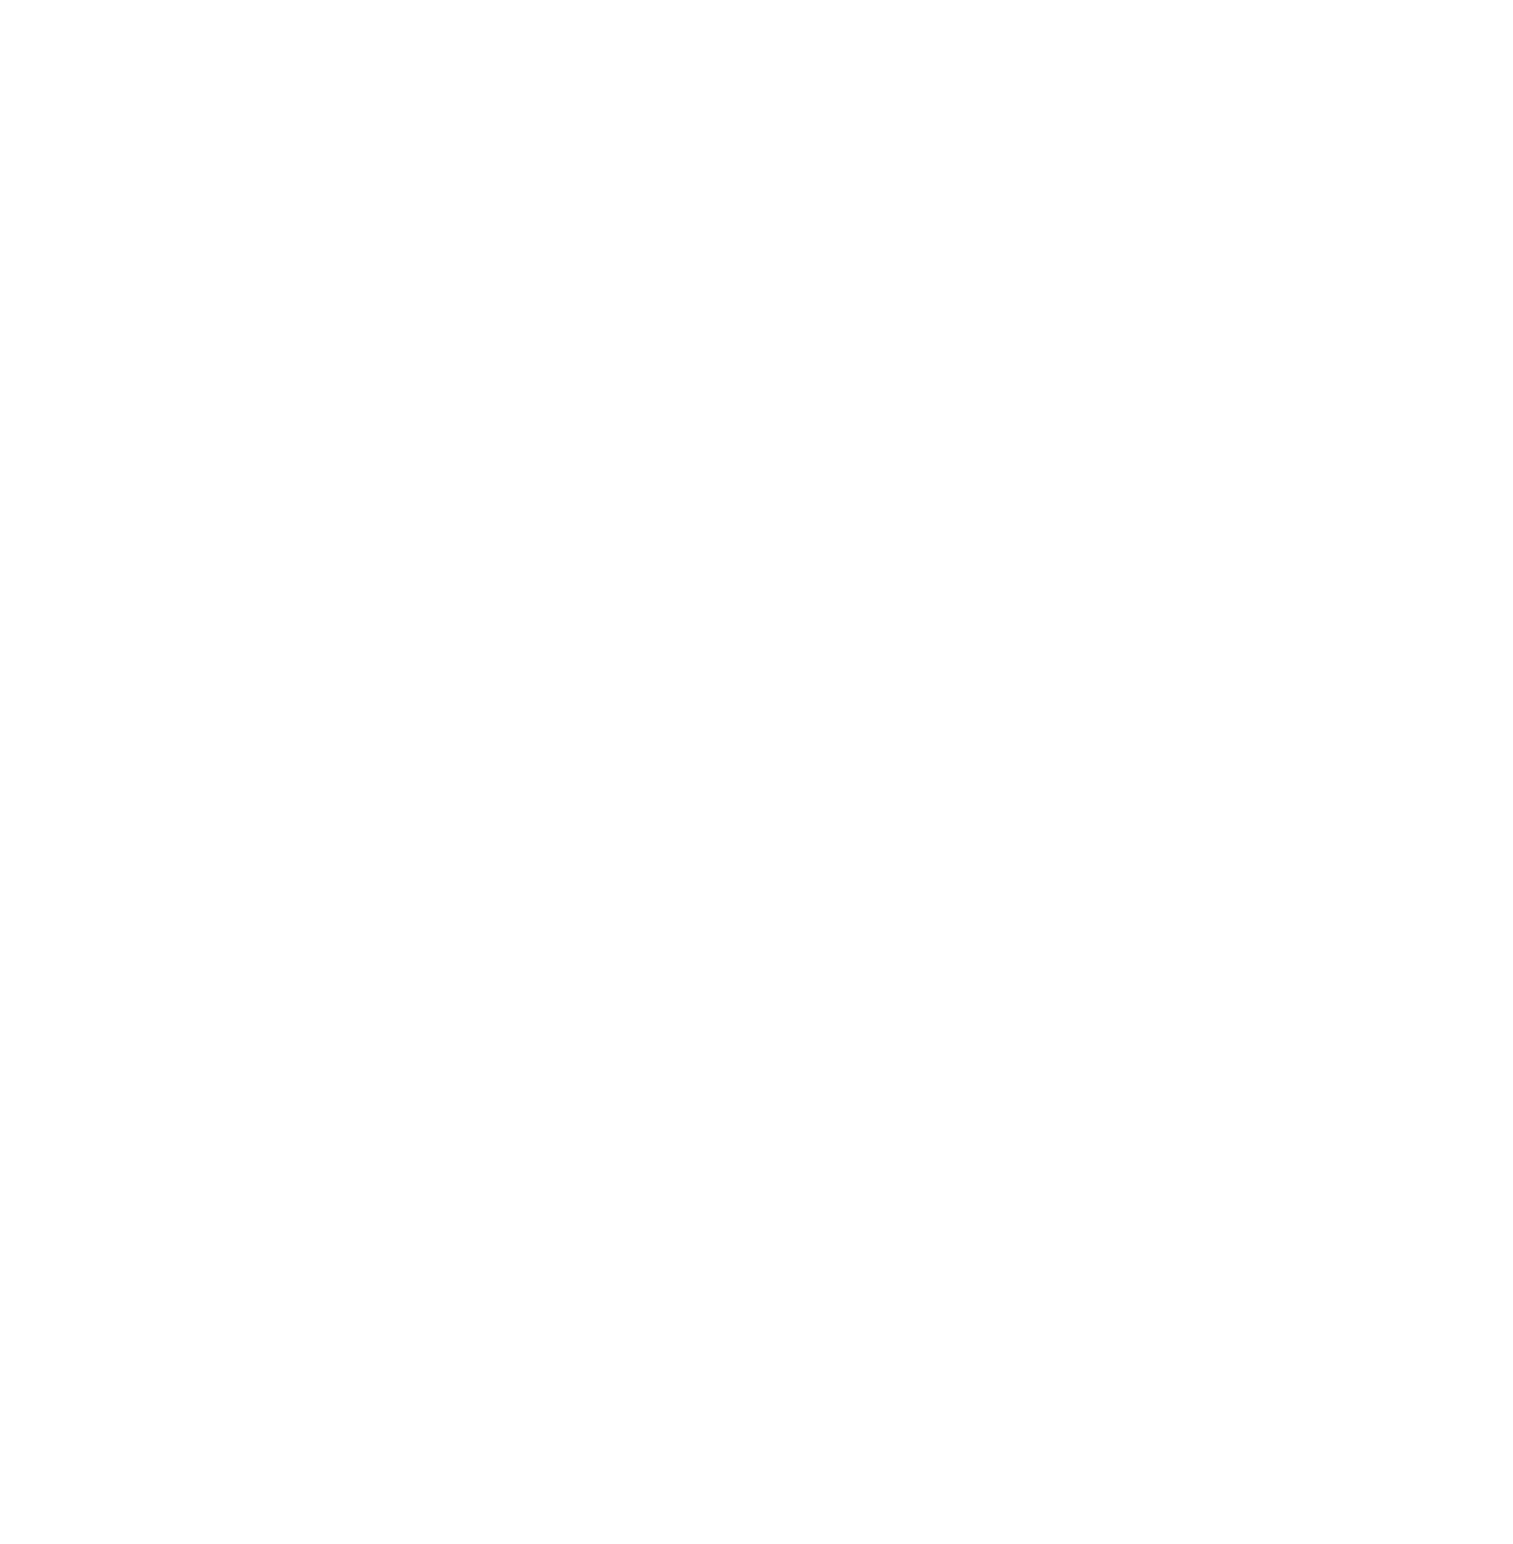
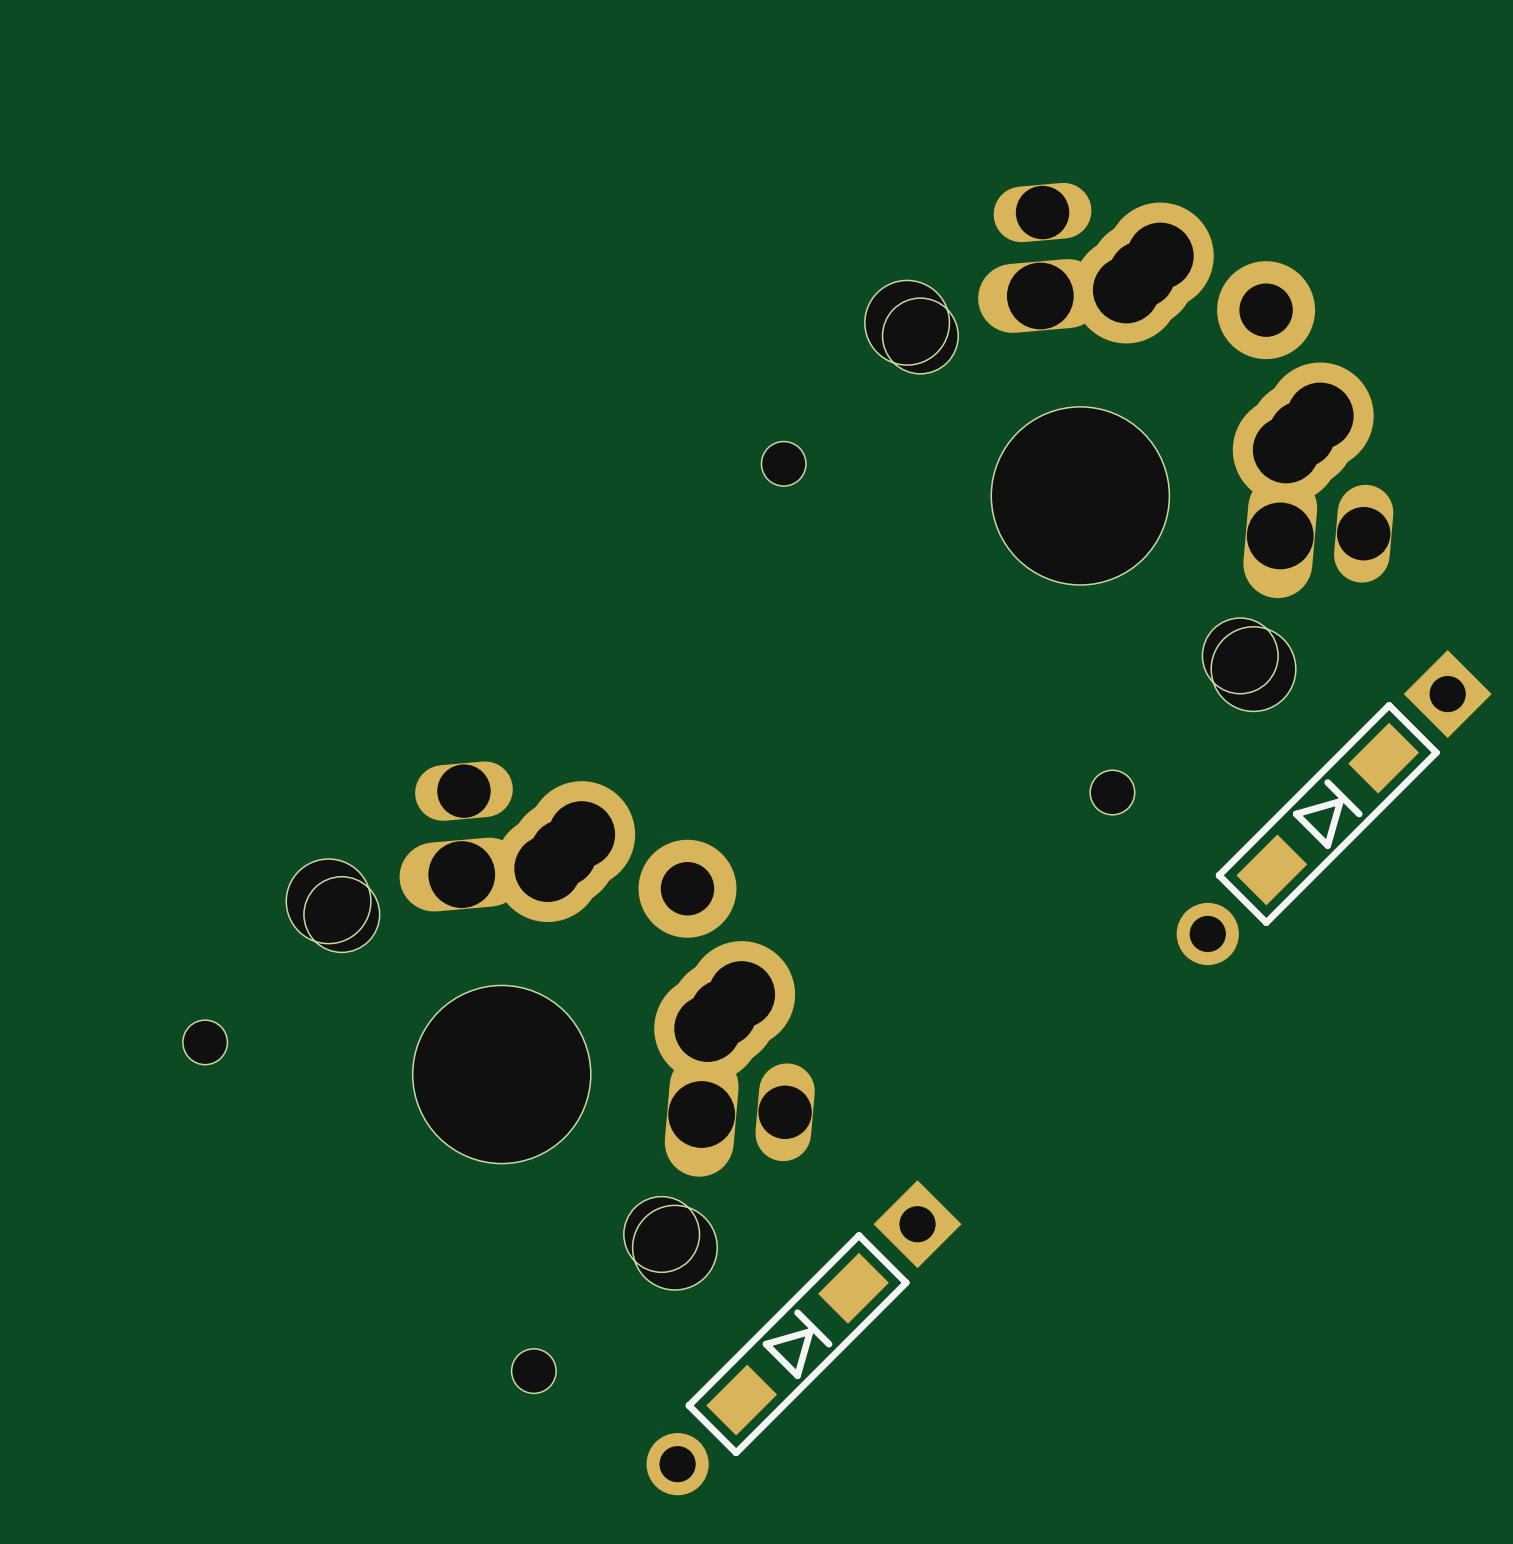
part: none -> (1077, 498)
part: none -> (1334, 807)
part: none -> (498, 1077)
part: none -> (804, 1337)

